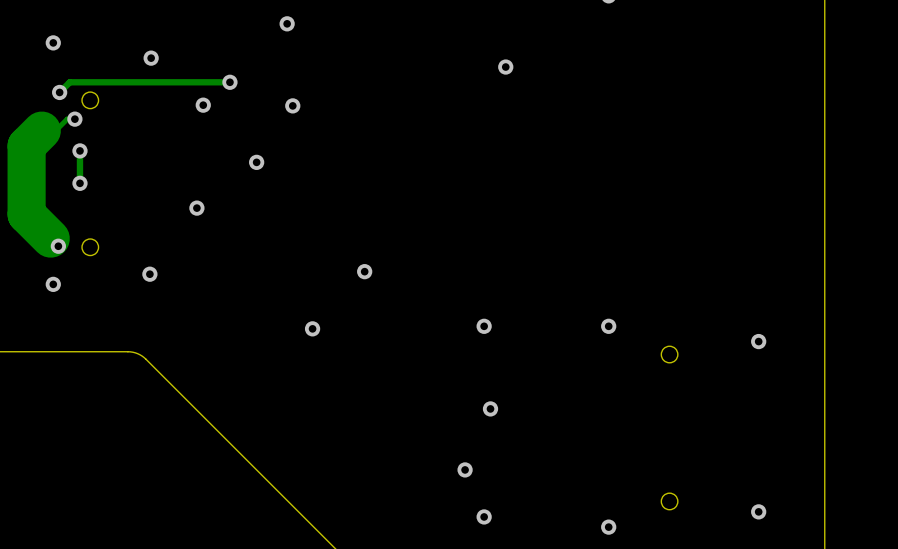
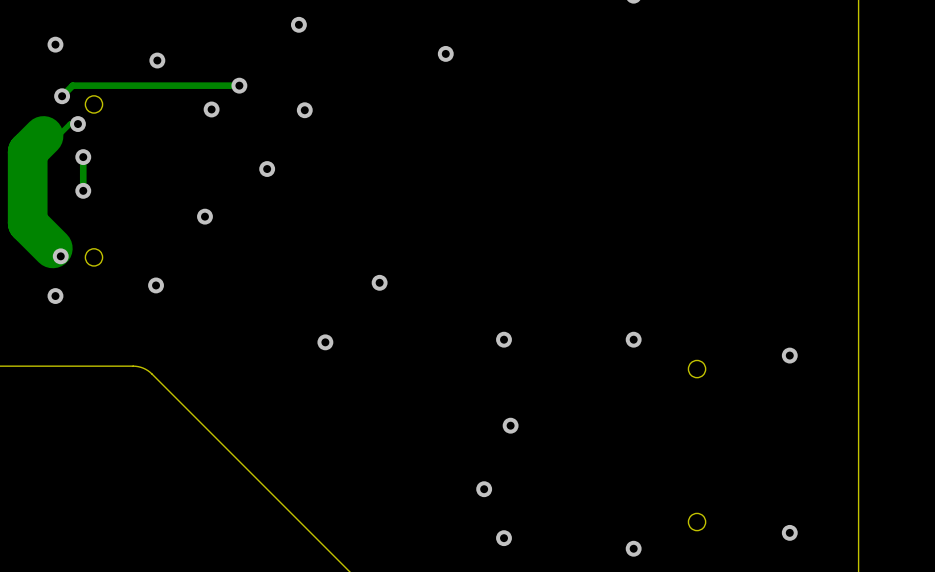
via: none -> (445, 53)
via: (505, 67) -> none

